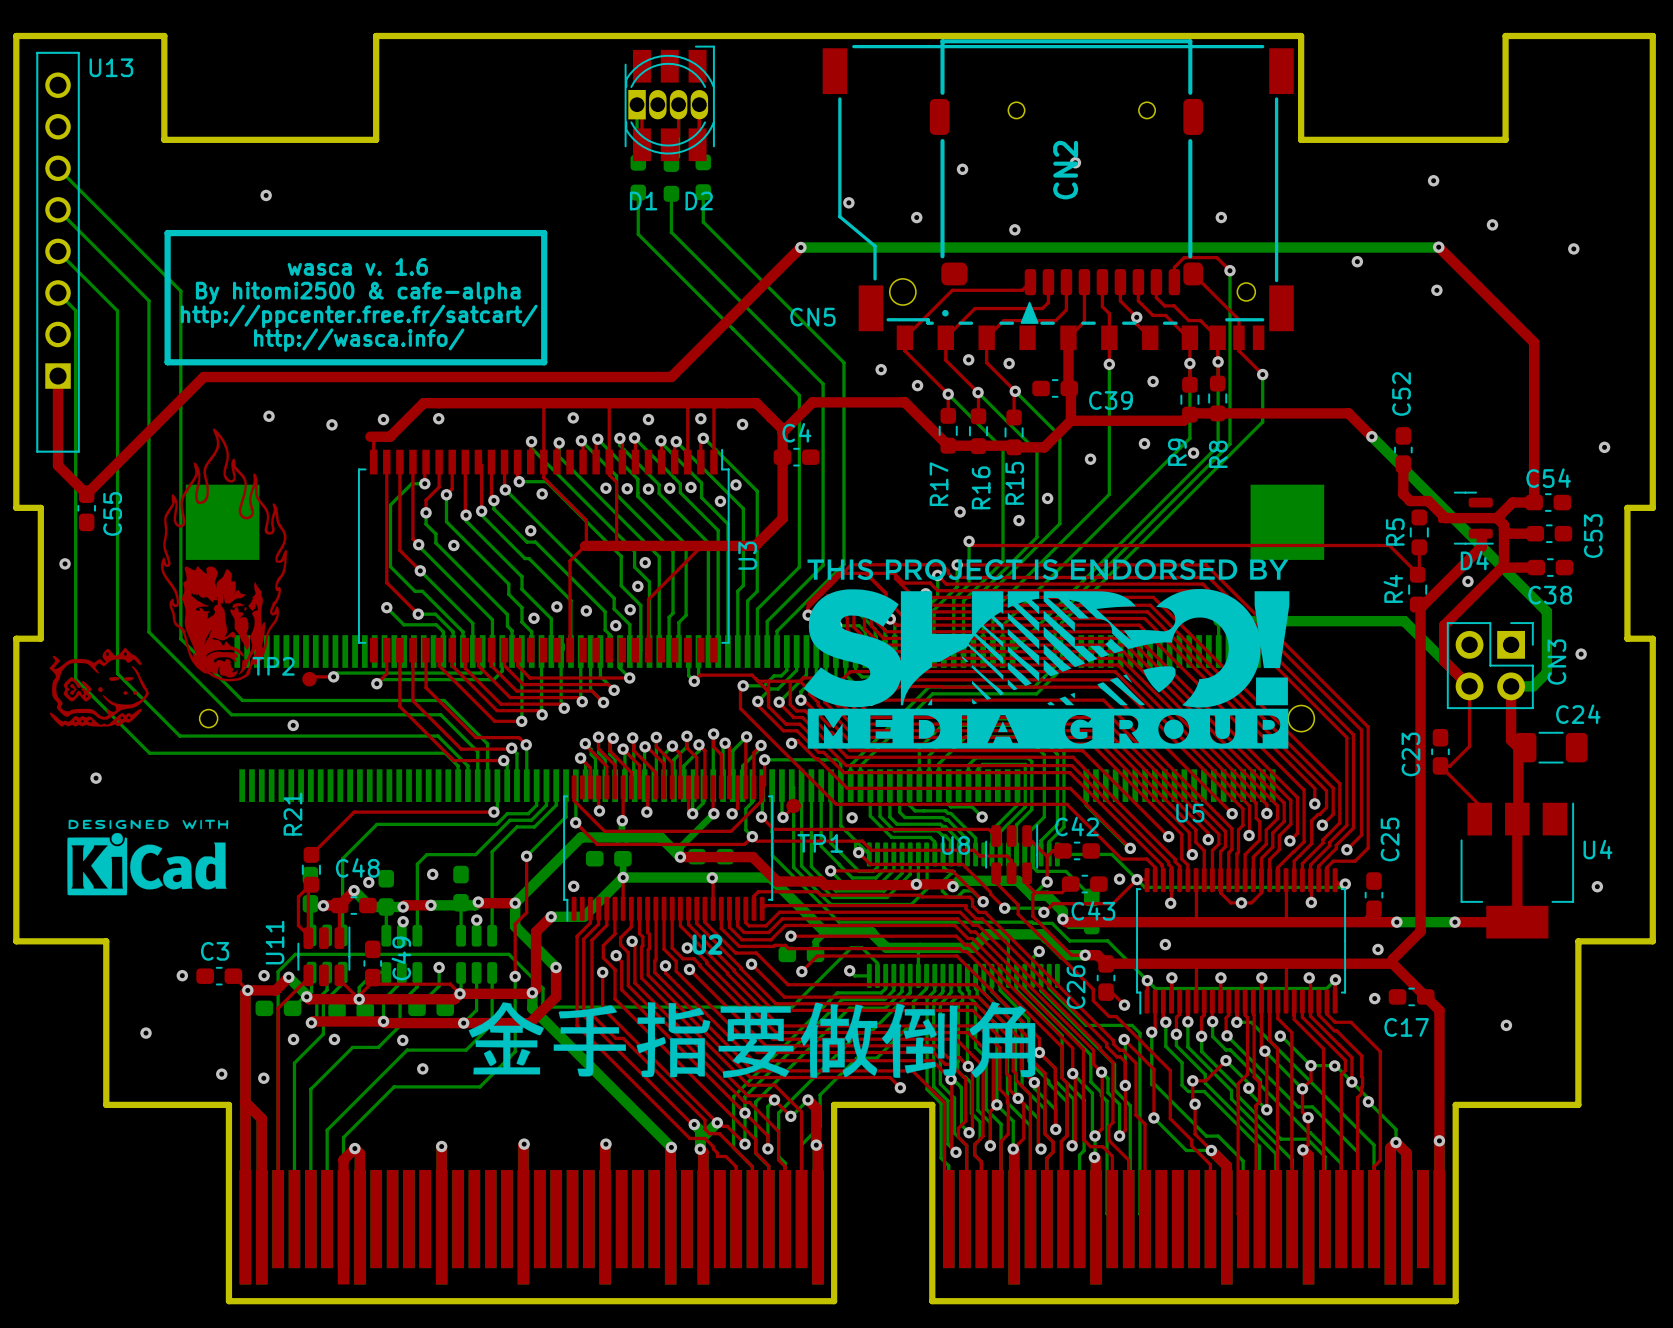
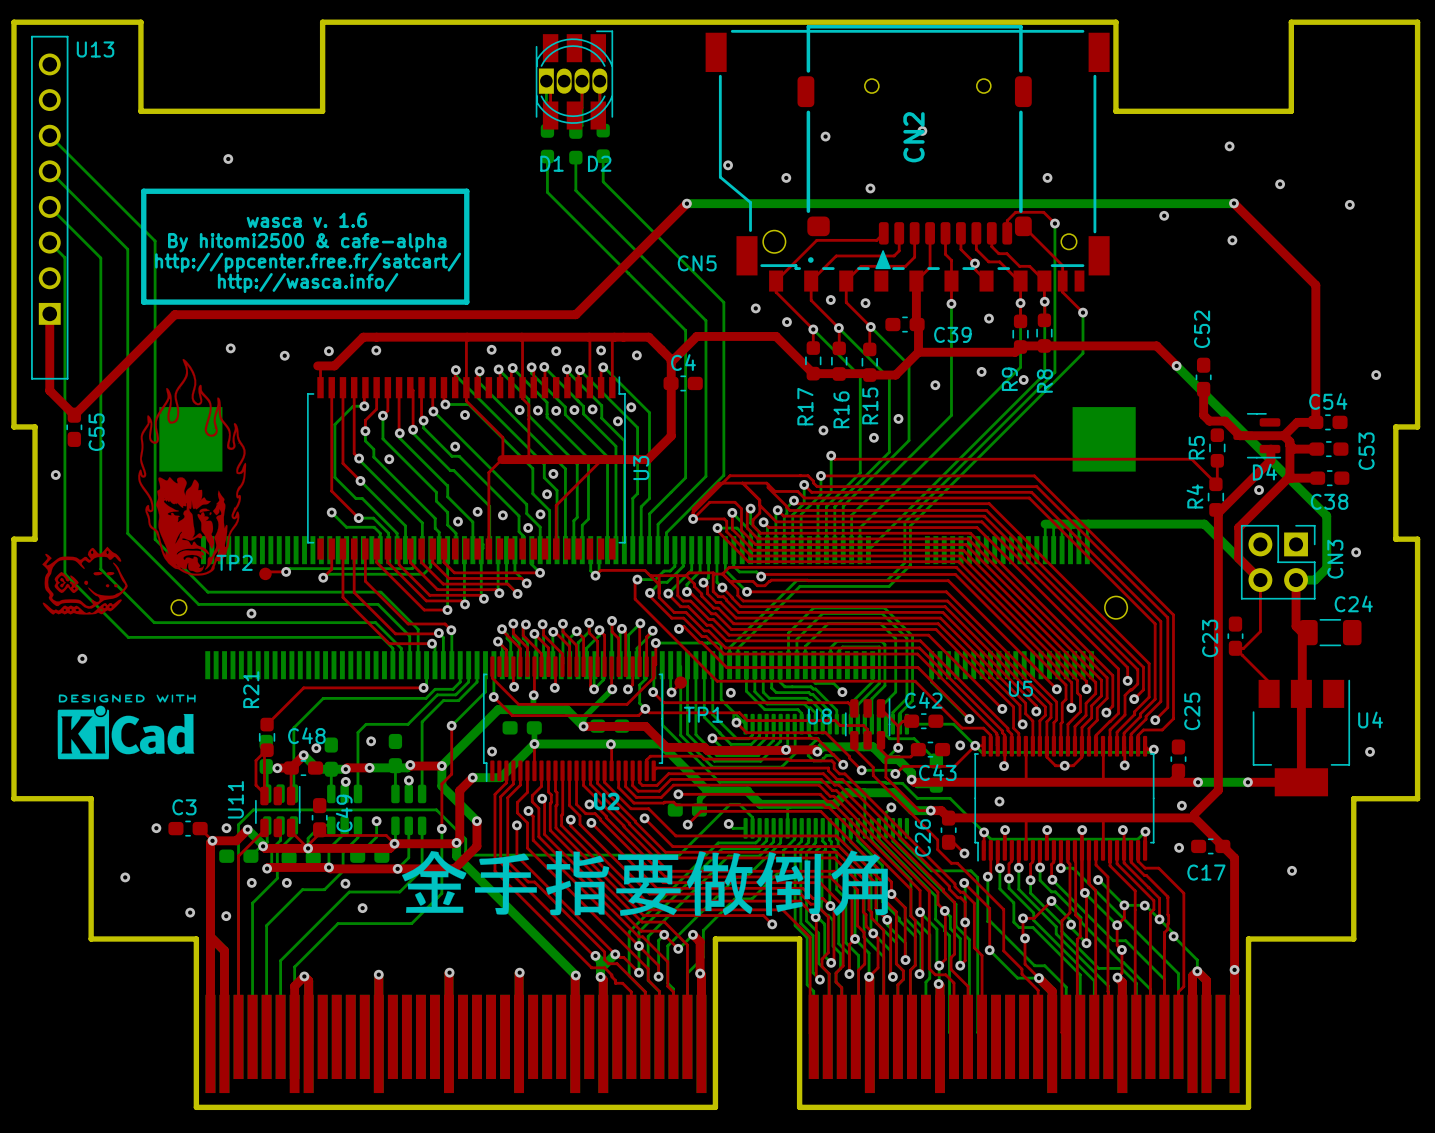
drawing: [803, 559, 1290, 749] -> none

